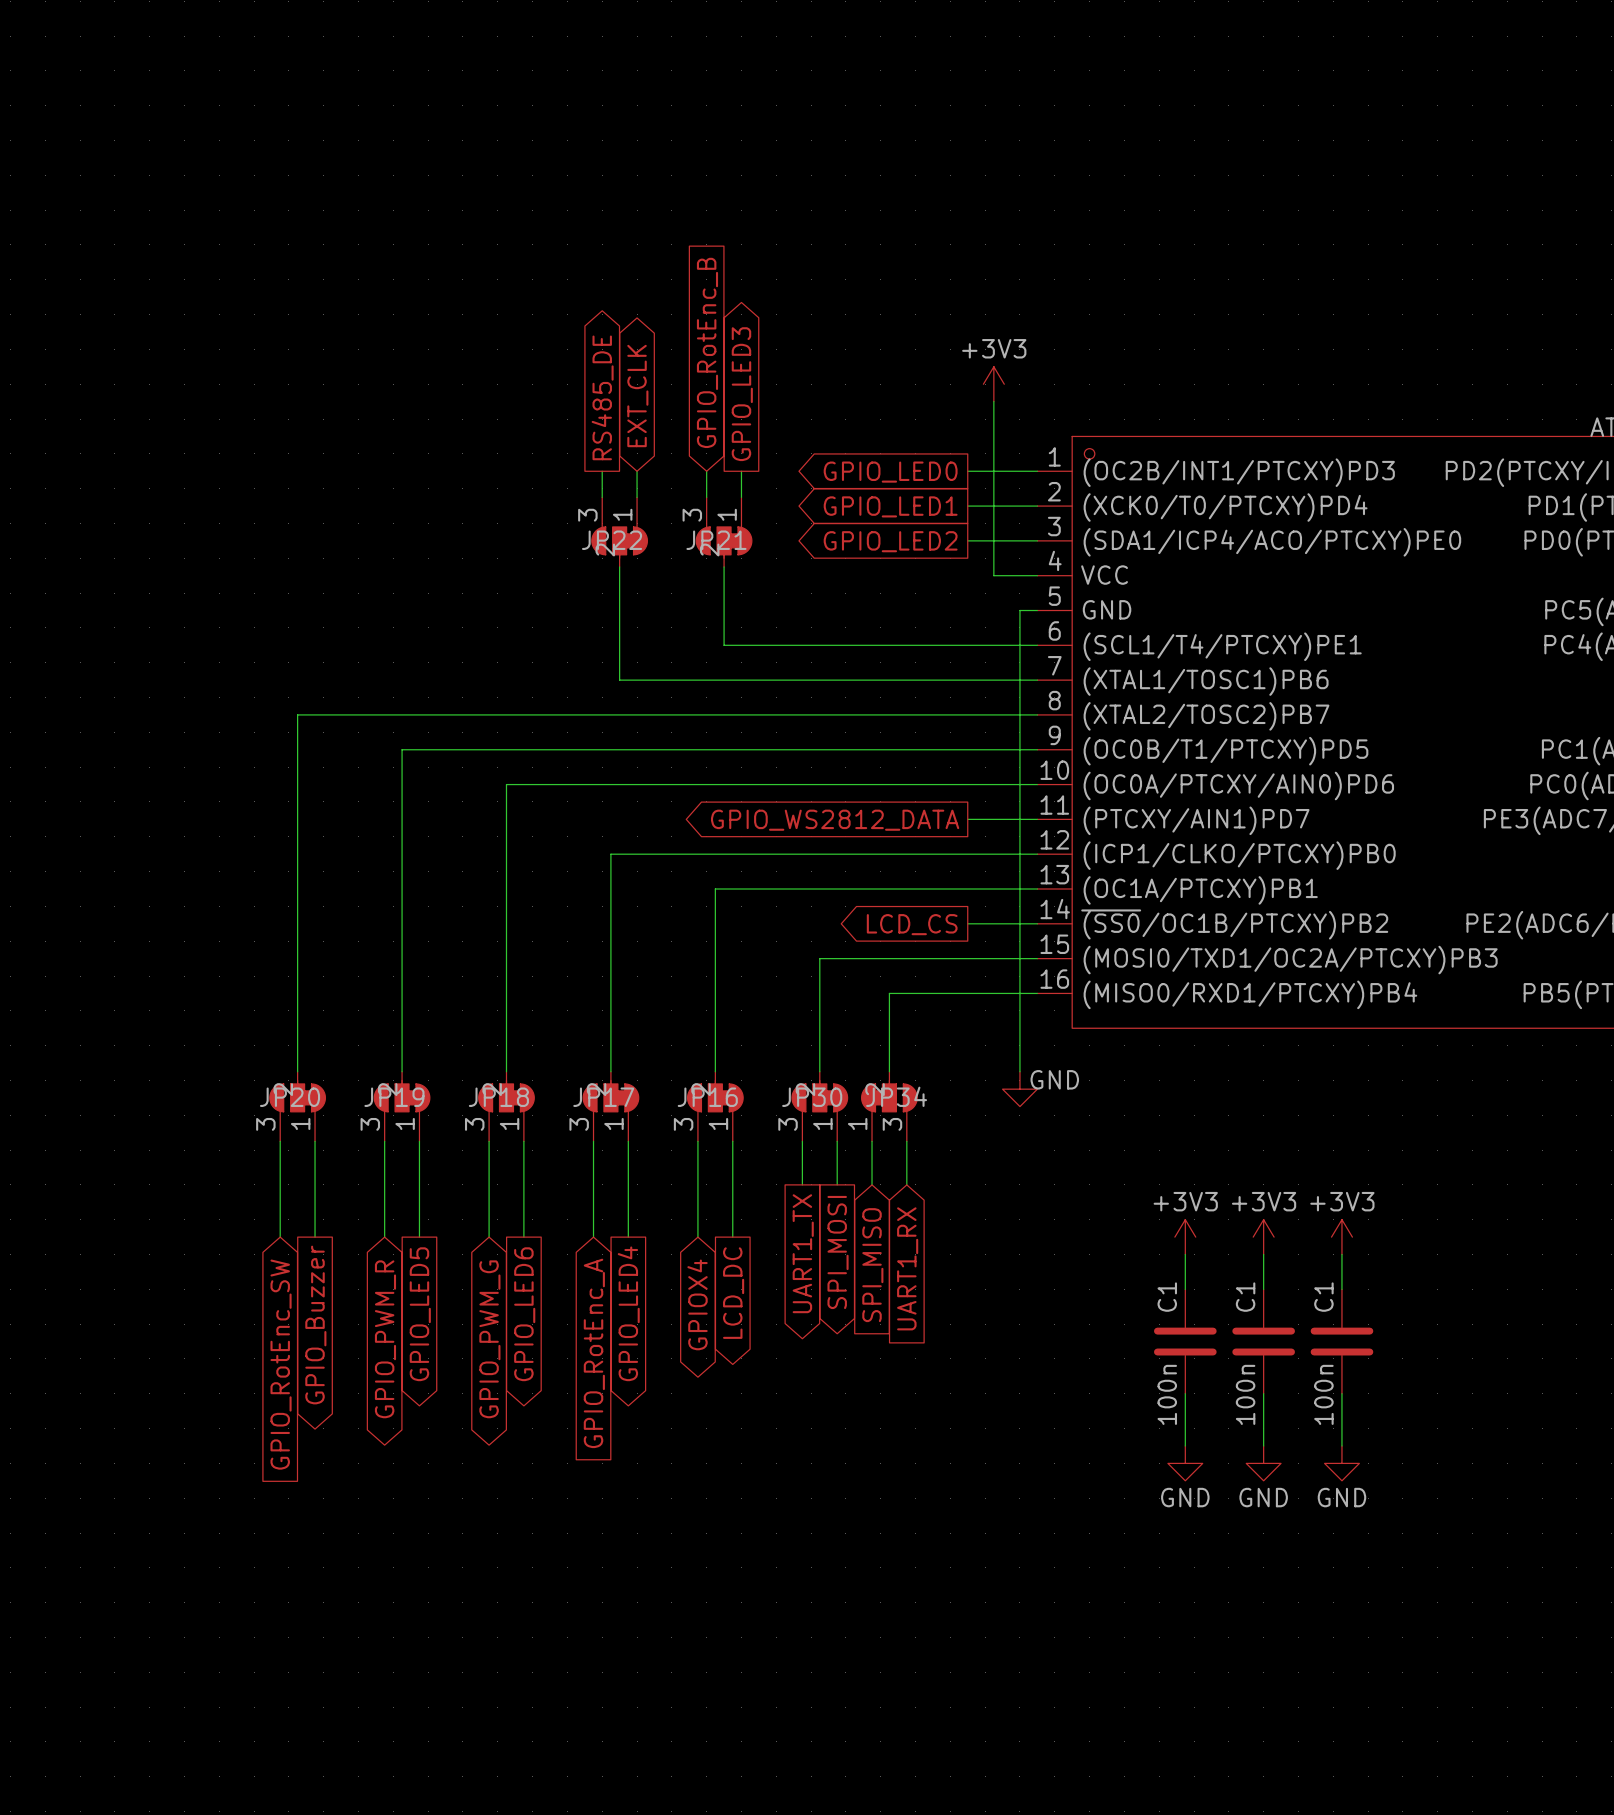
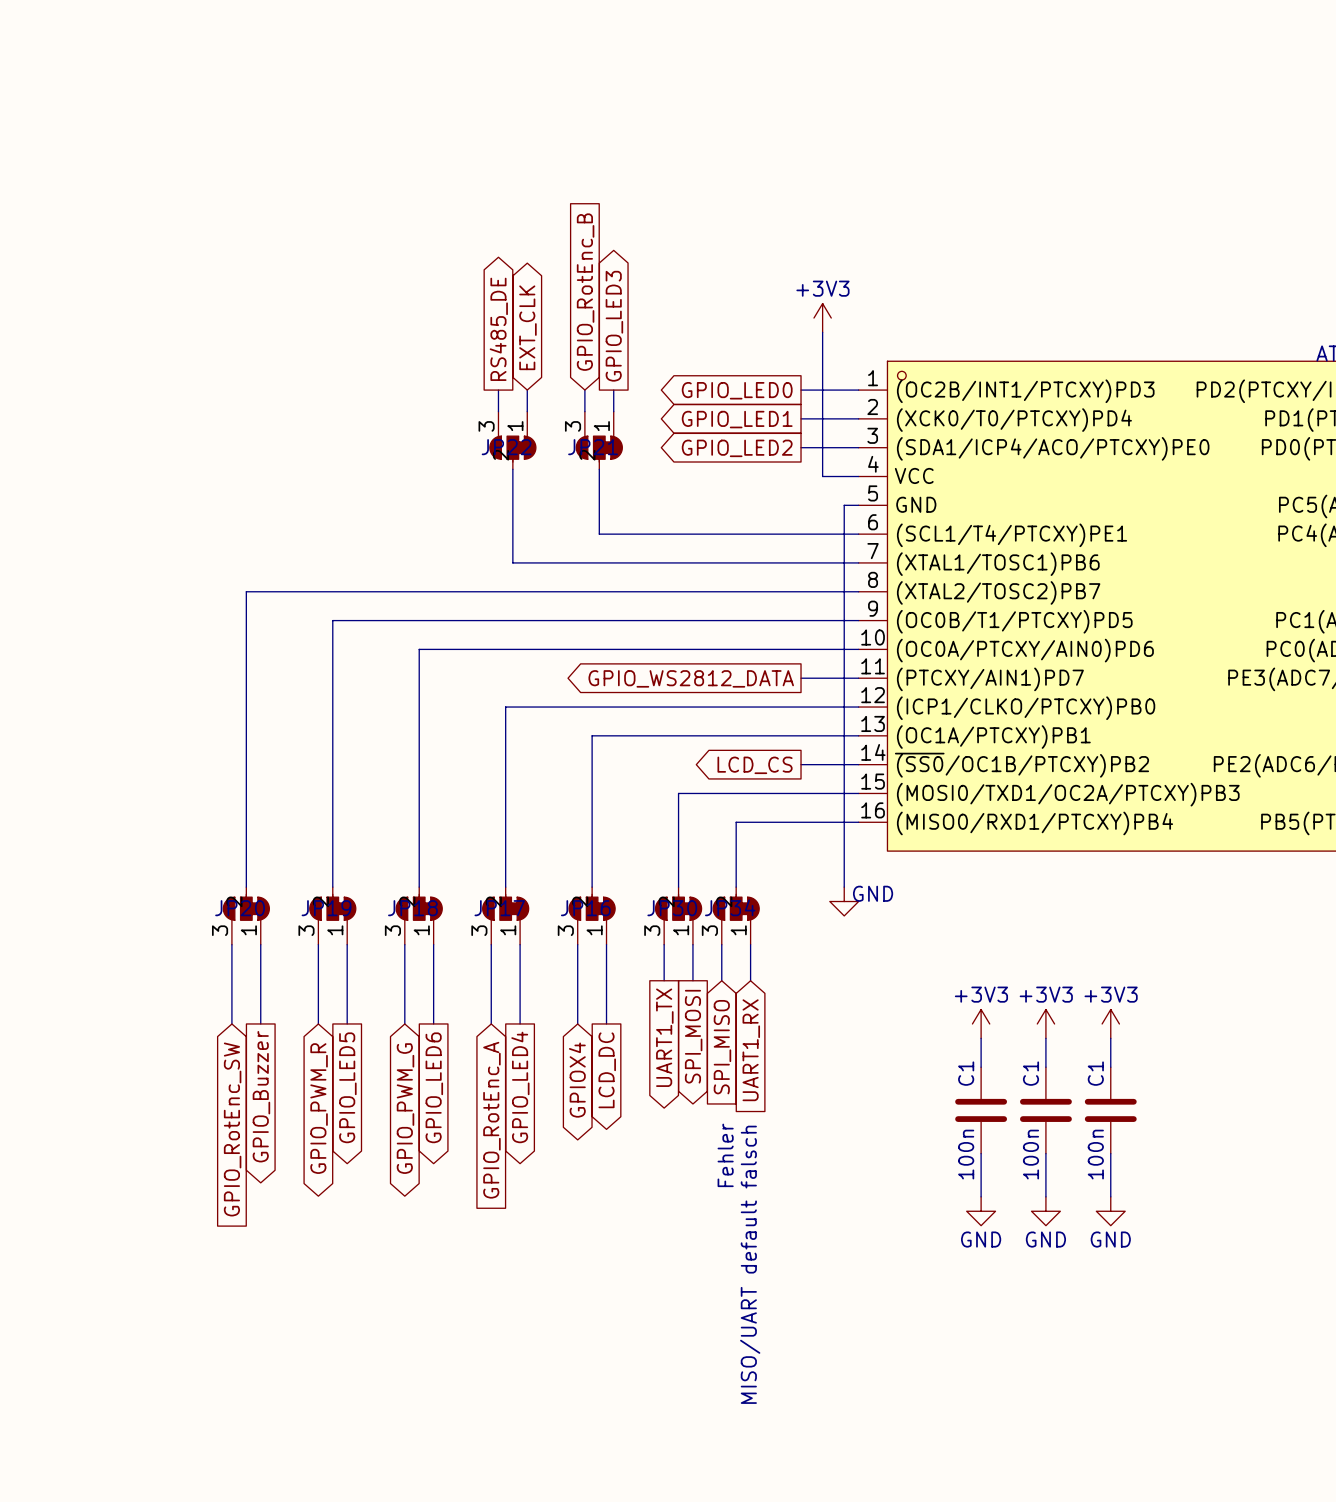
JP34 flip: as is (889, 1096) -> left-right (736, 907)
text: none -> Fehler (725, 1155)
text: none -> MISO/UART default falsch (750, 1264)

